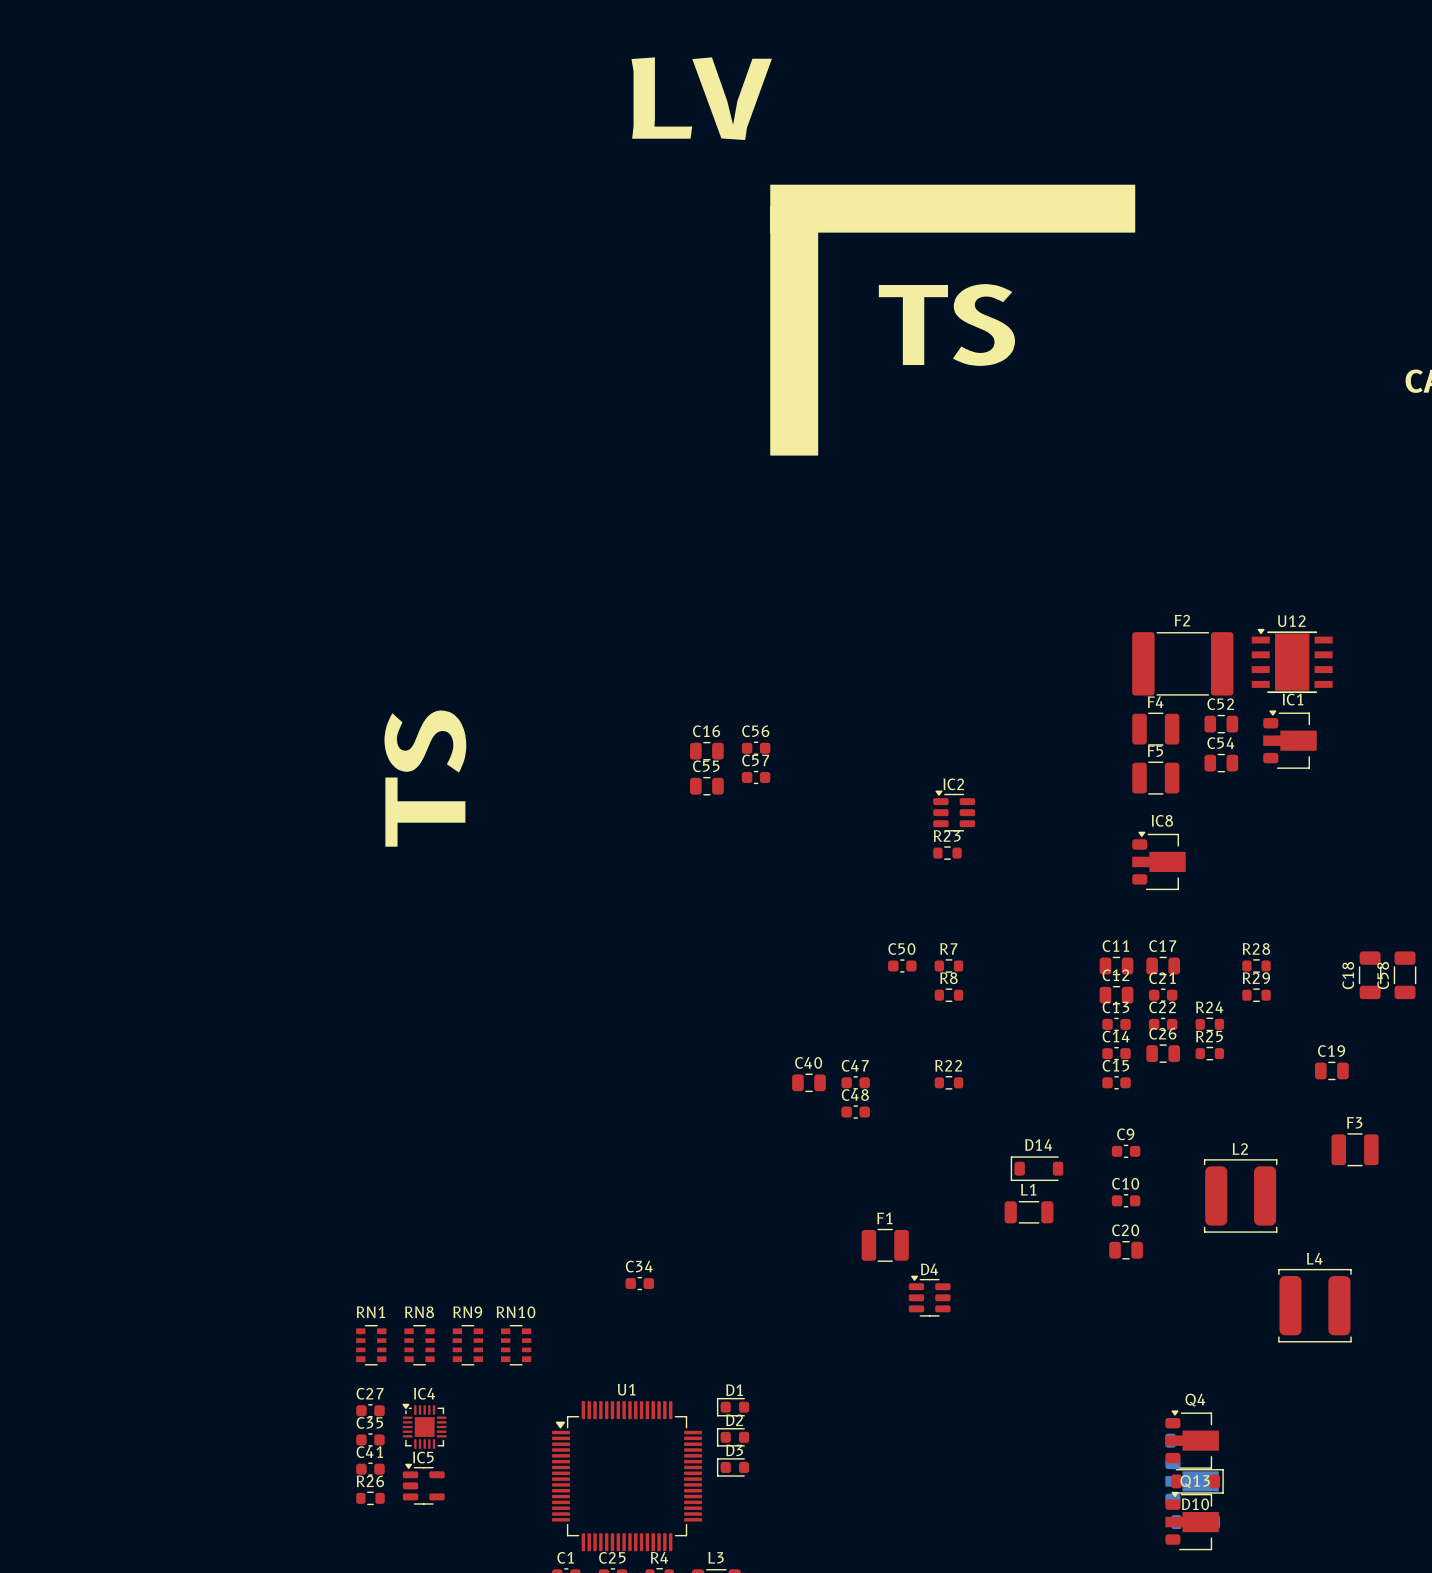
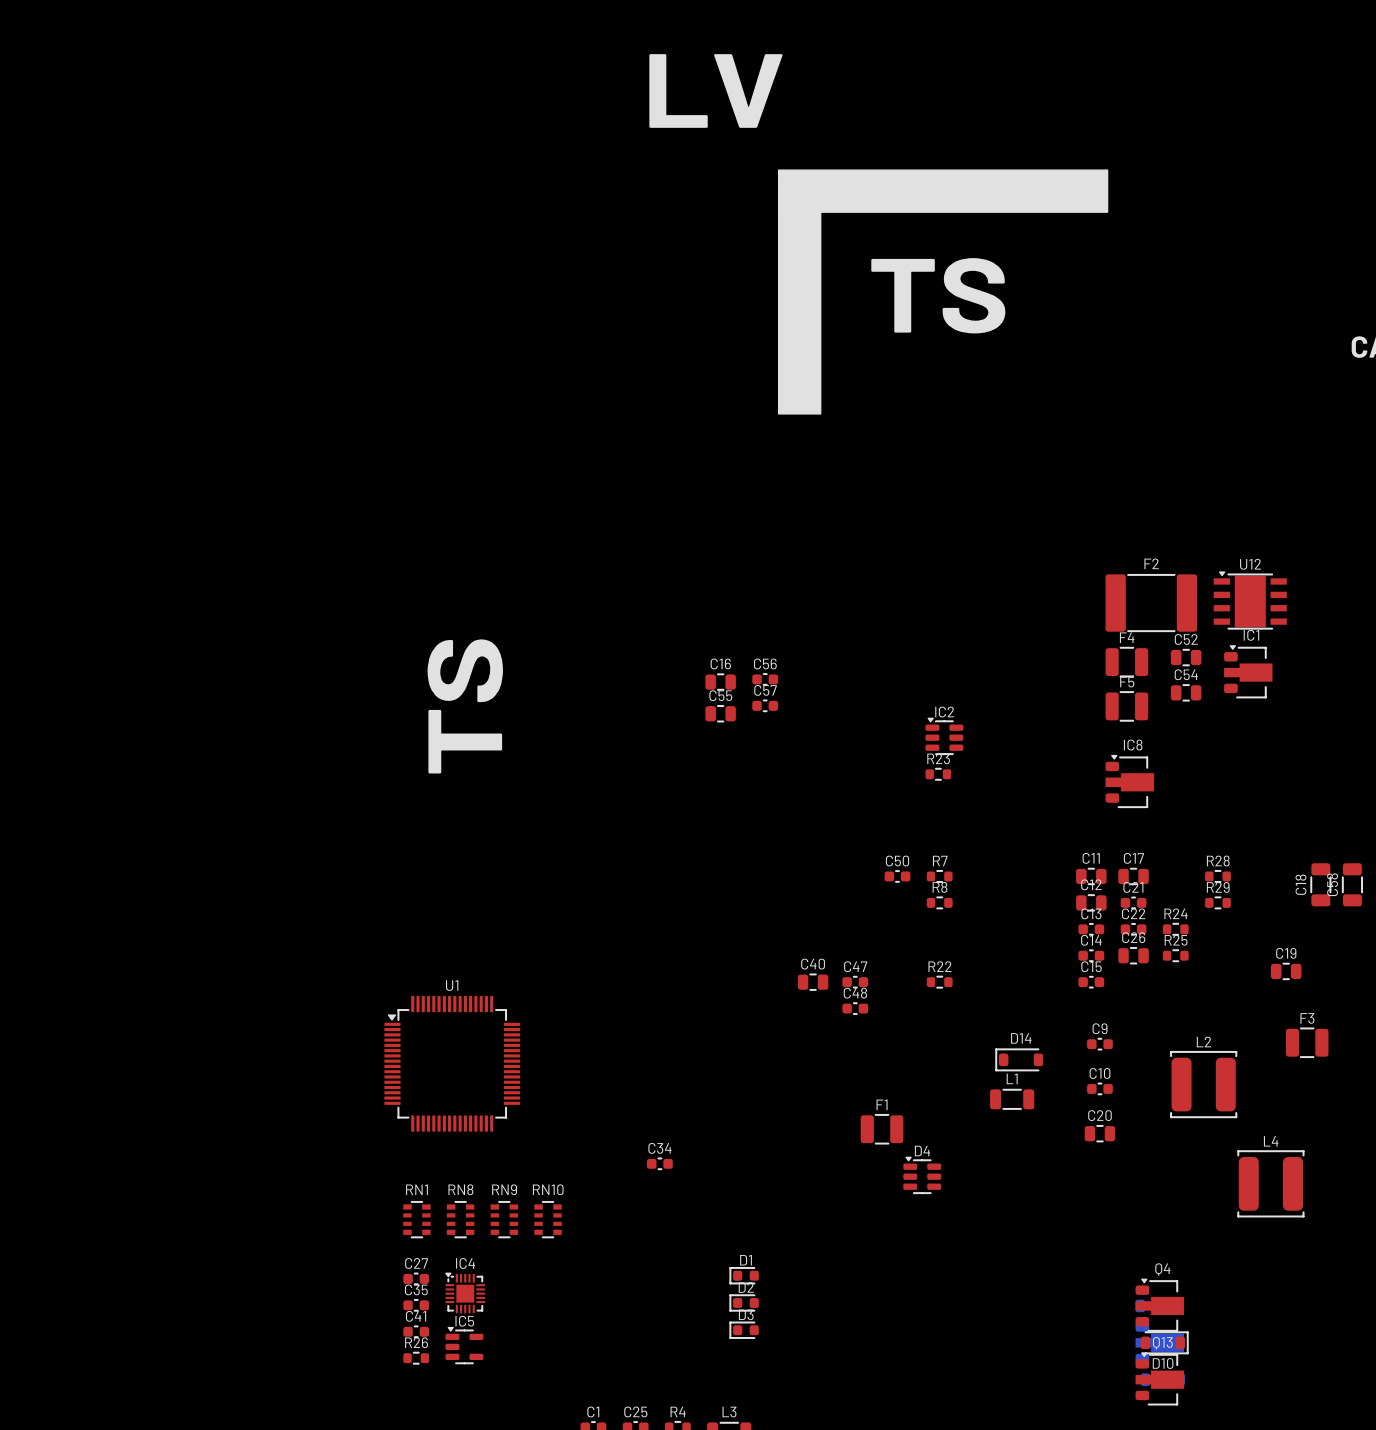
U1 position: (627, 1476) -> (452, 1063)

